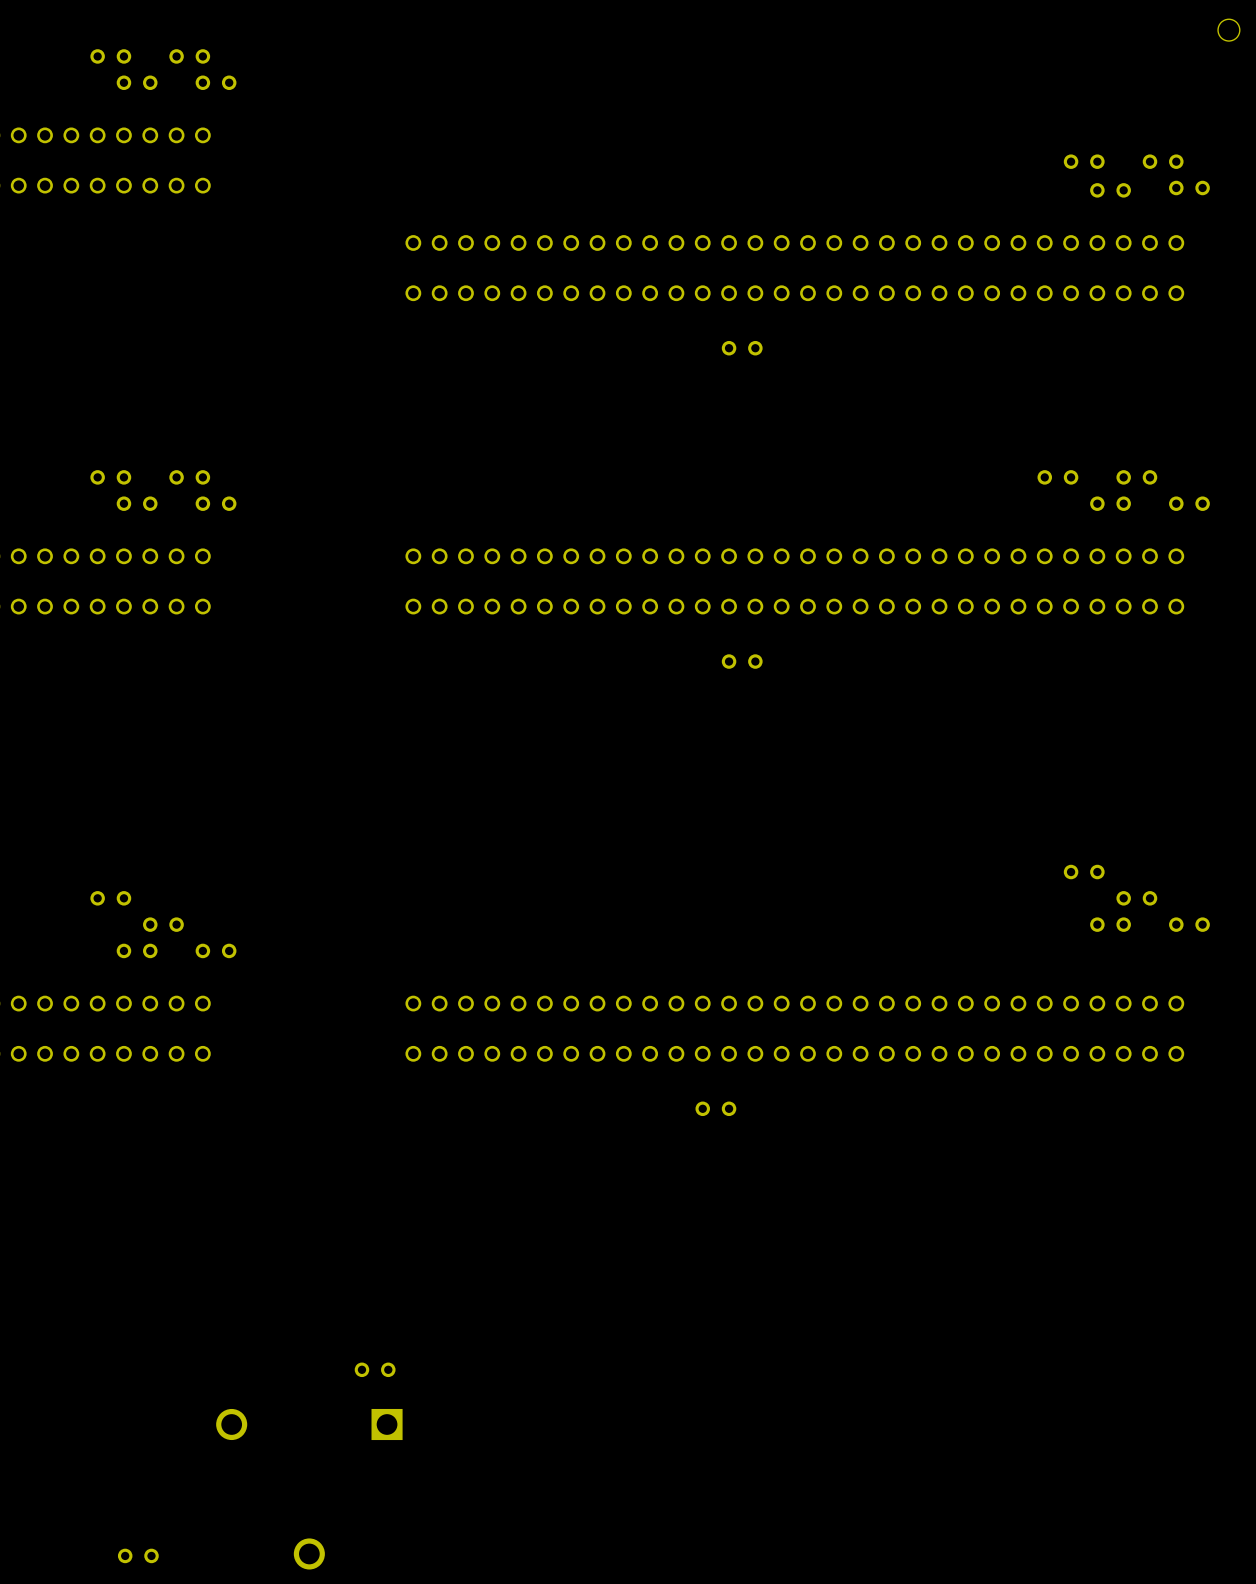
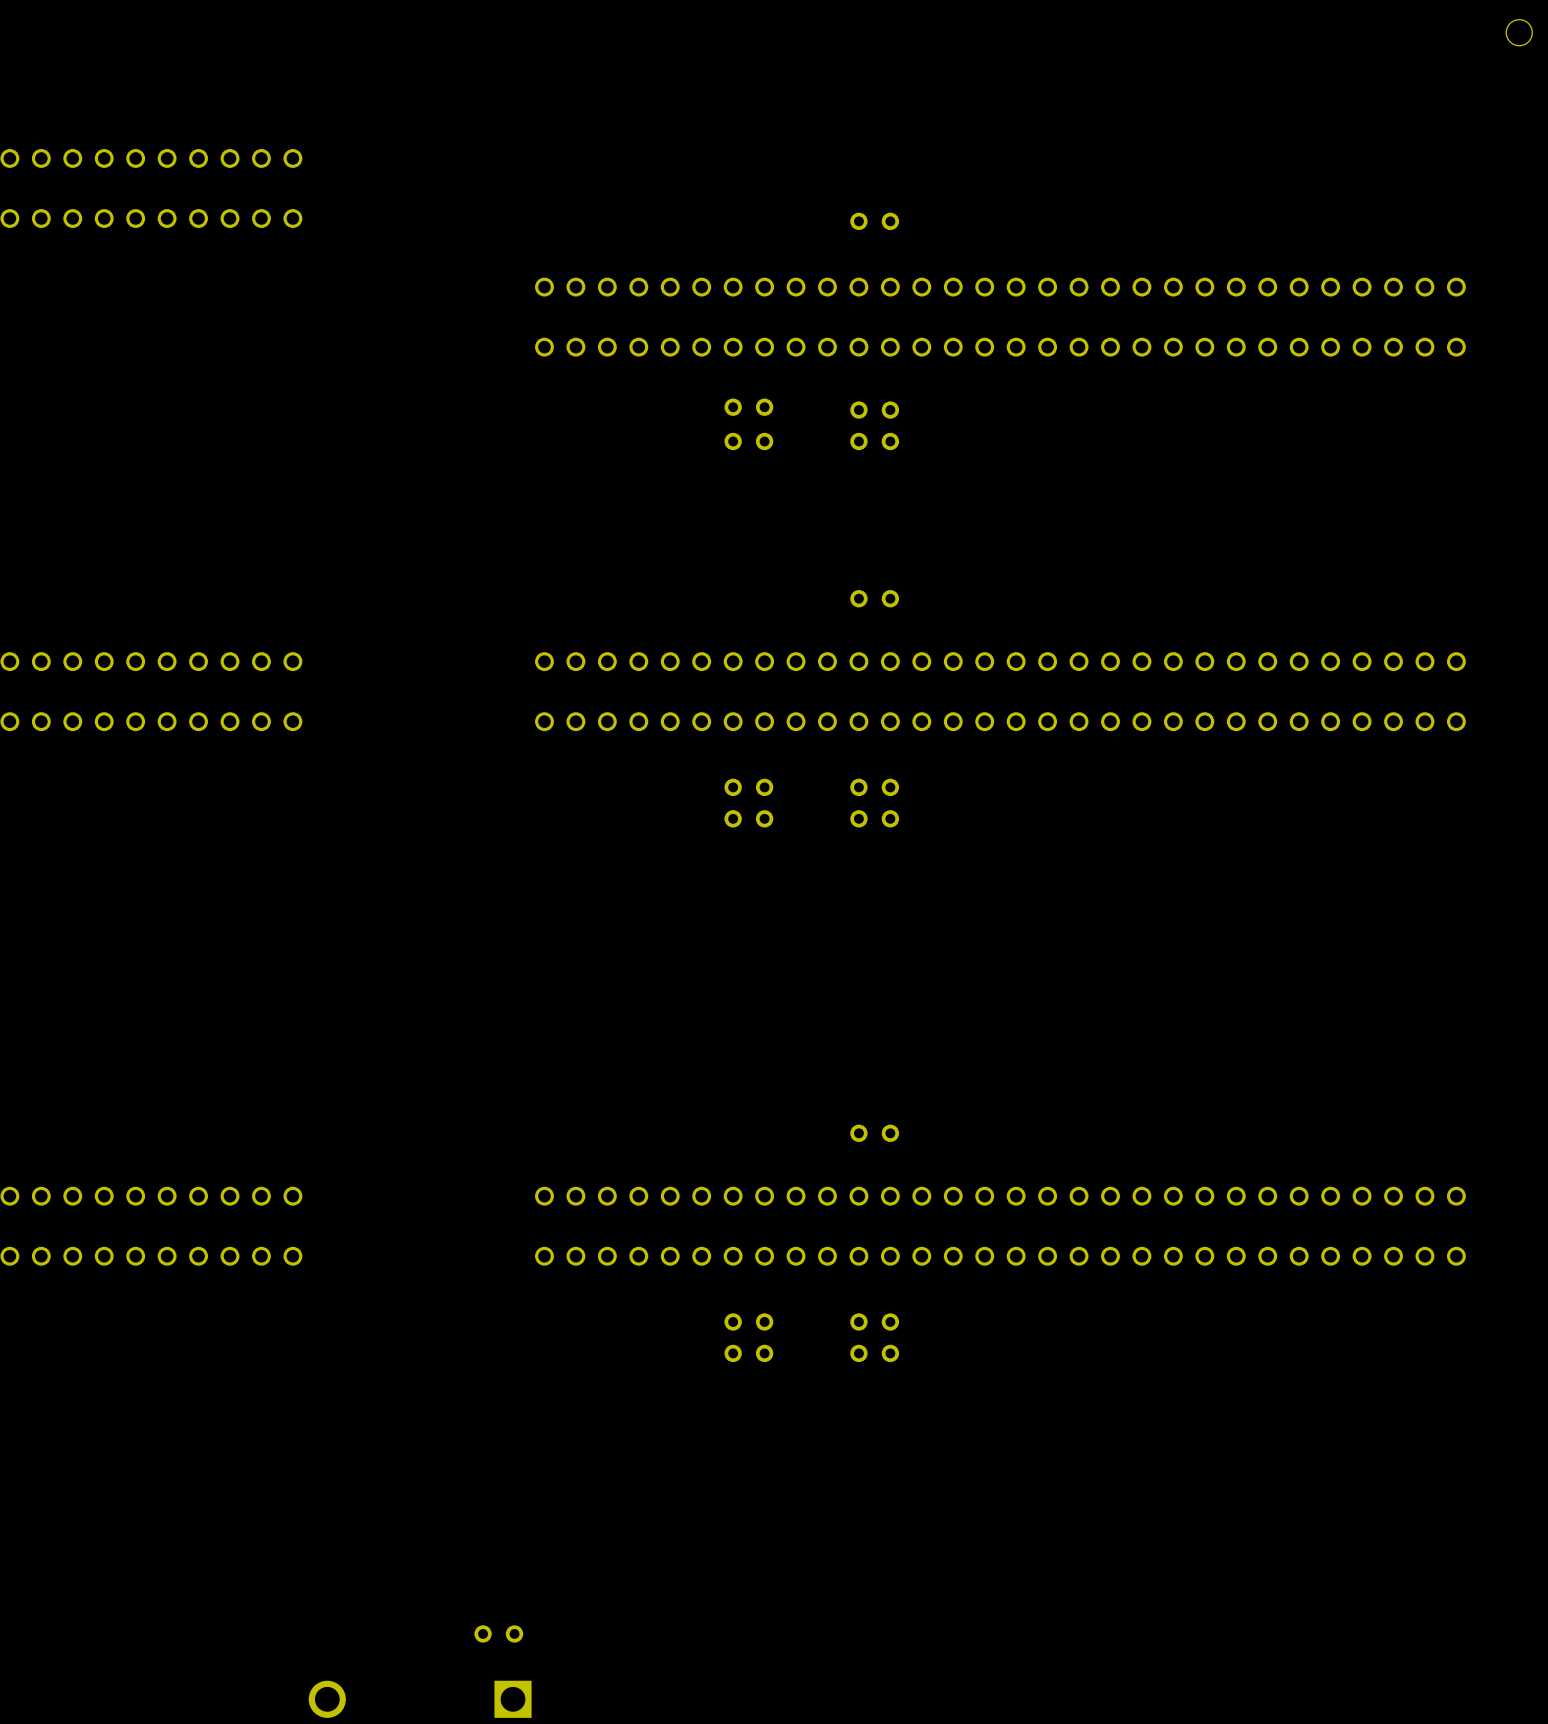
part: (110, 56) -> none
part: (189, 56) -> none
part: (137, 82) -> none
part: (216, 82) -> none
part: (1084, 161) -> none
part: (1163, 161) -> none
part: none -> (874, 221)
part: (1189, 187) -> none
part: (1110, 190) -> none
part: none -> (748, 407)
part: none -> (874, 410)
part: (742, 348) -> none
part: none -> (748, 441)
part: none -> (874, 441)
part: (110, 477) -> none
part: (189, 477) -> none
part: (1057, 477) -> none
part: (1136, 477) -> none
part: (137, 503) -> none
part: (216, 503) -> none
part: none -> (874, 598)
part: (1110, 503) -> none
part: (1189, 503) -> none
part: none -> (748, 787)
part: none -> (874, 787)
part: (742, 661) -> none
part: none -> (748, 818)
part: none -> (874, 818)
part: (1084, 872) -> none
part: (110, 898) -> none
part: (1136, 898) -> none
part: (163, 924) -> none
part: (1110, 924) -> none
part: (1189, 924) -> none
part: (137, 950) -> none
part: (216, 950) -> none
part: none -> (874, 1133)
part: none -> (748, 1321)
part: none -> (874, 1321)
part: (715, 1108) -> none
part: none -> (748, 1353)
part: none -> (874, 1353)

